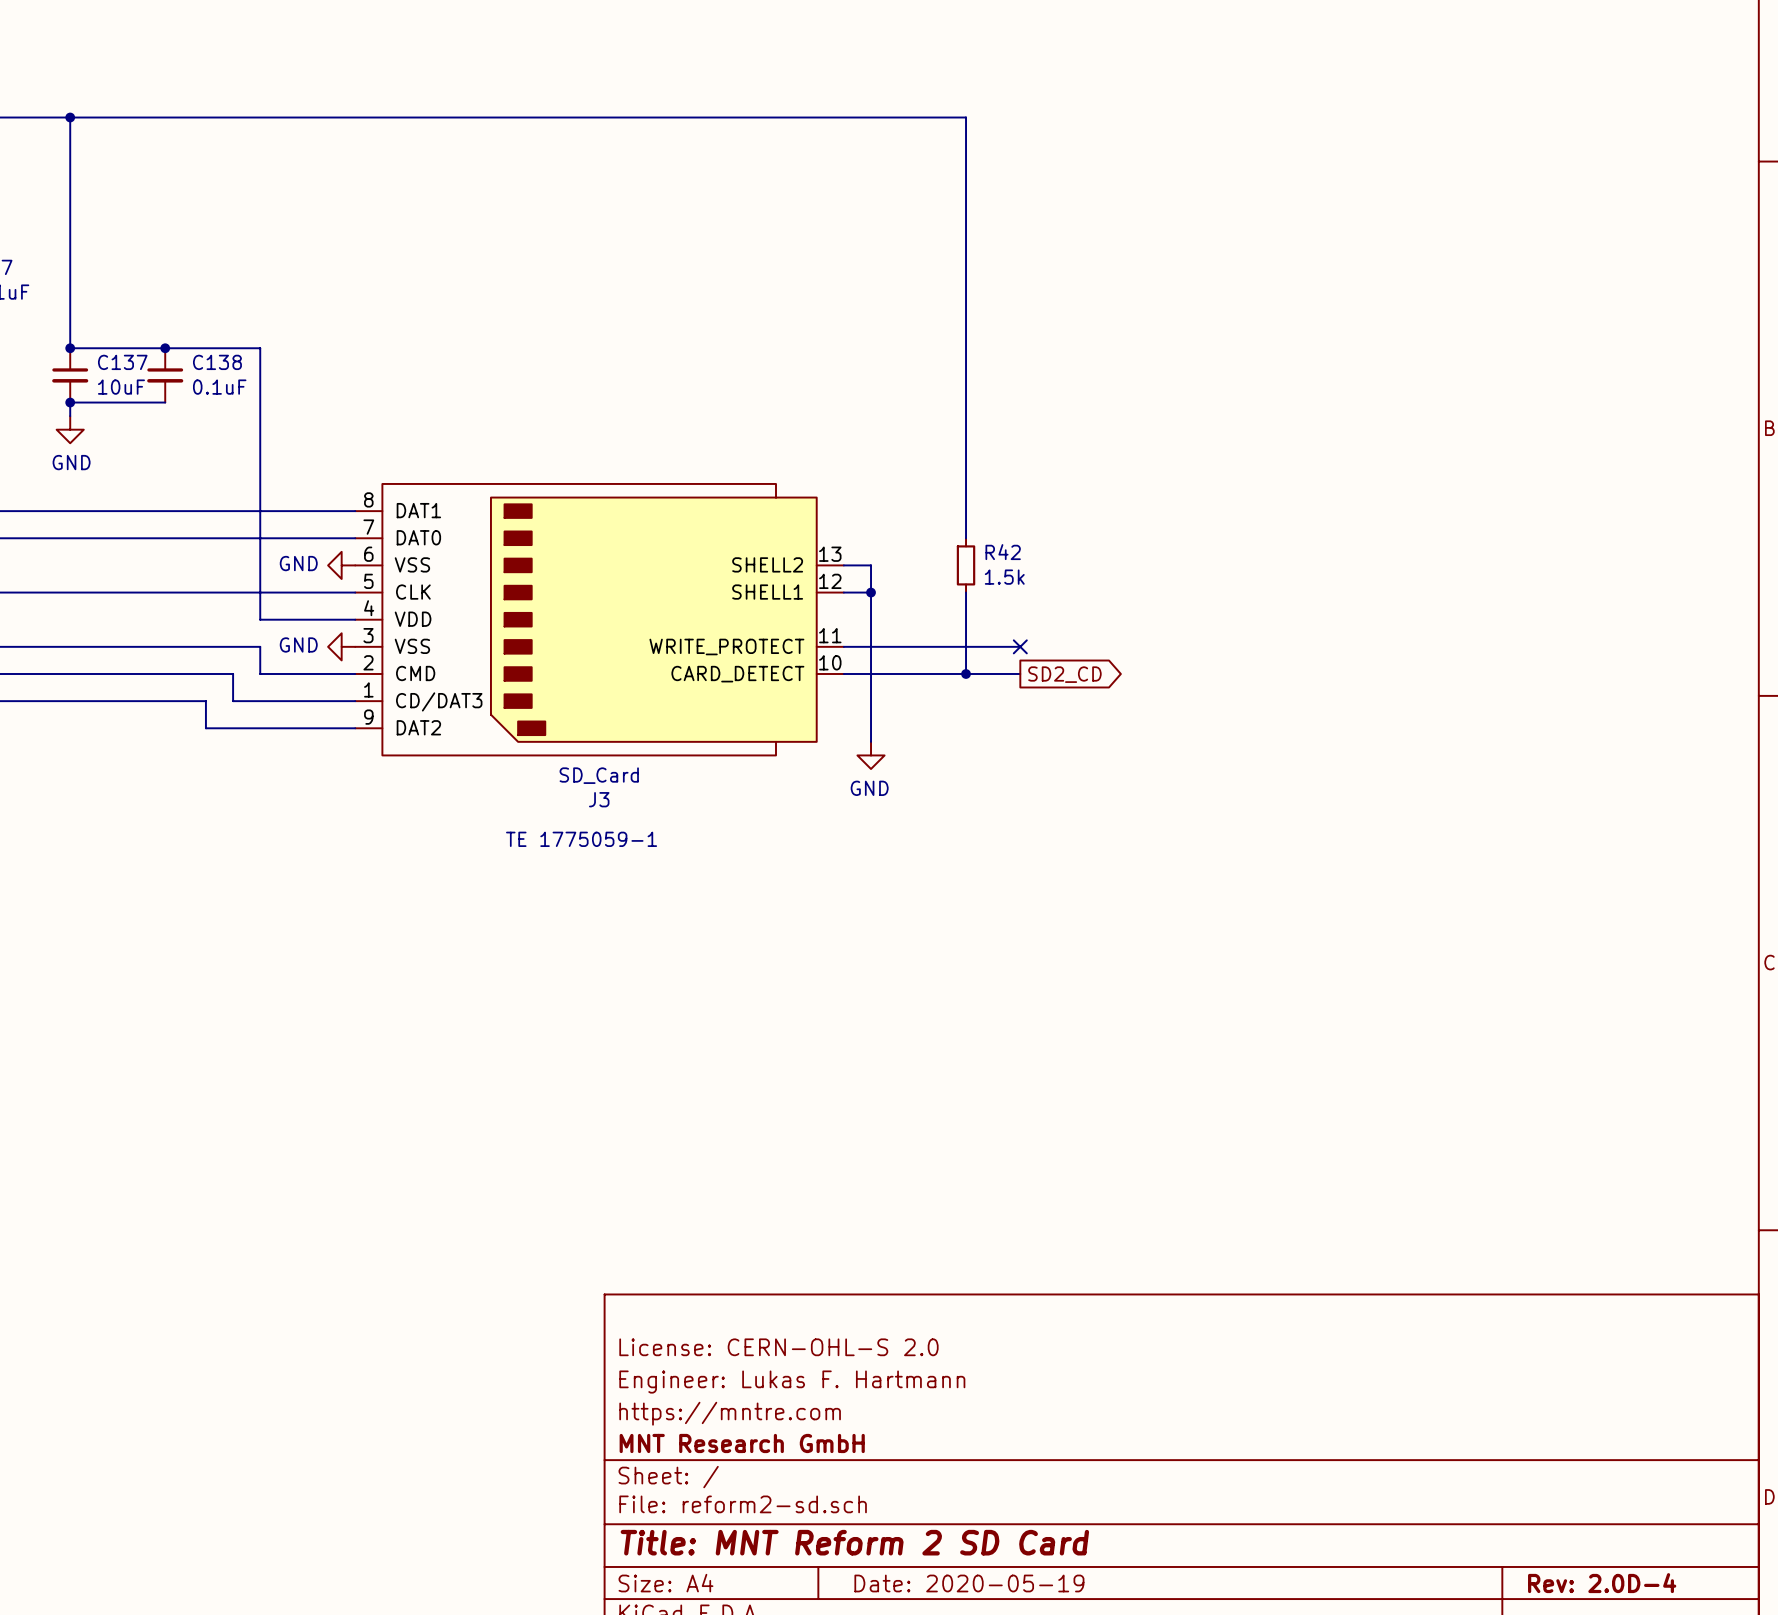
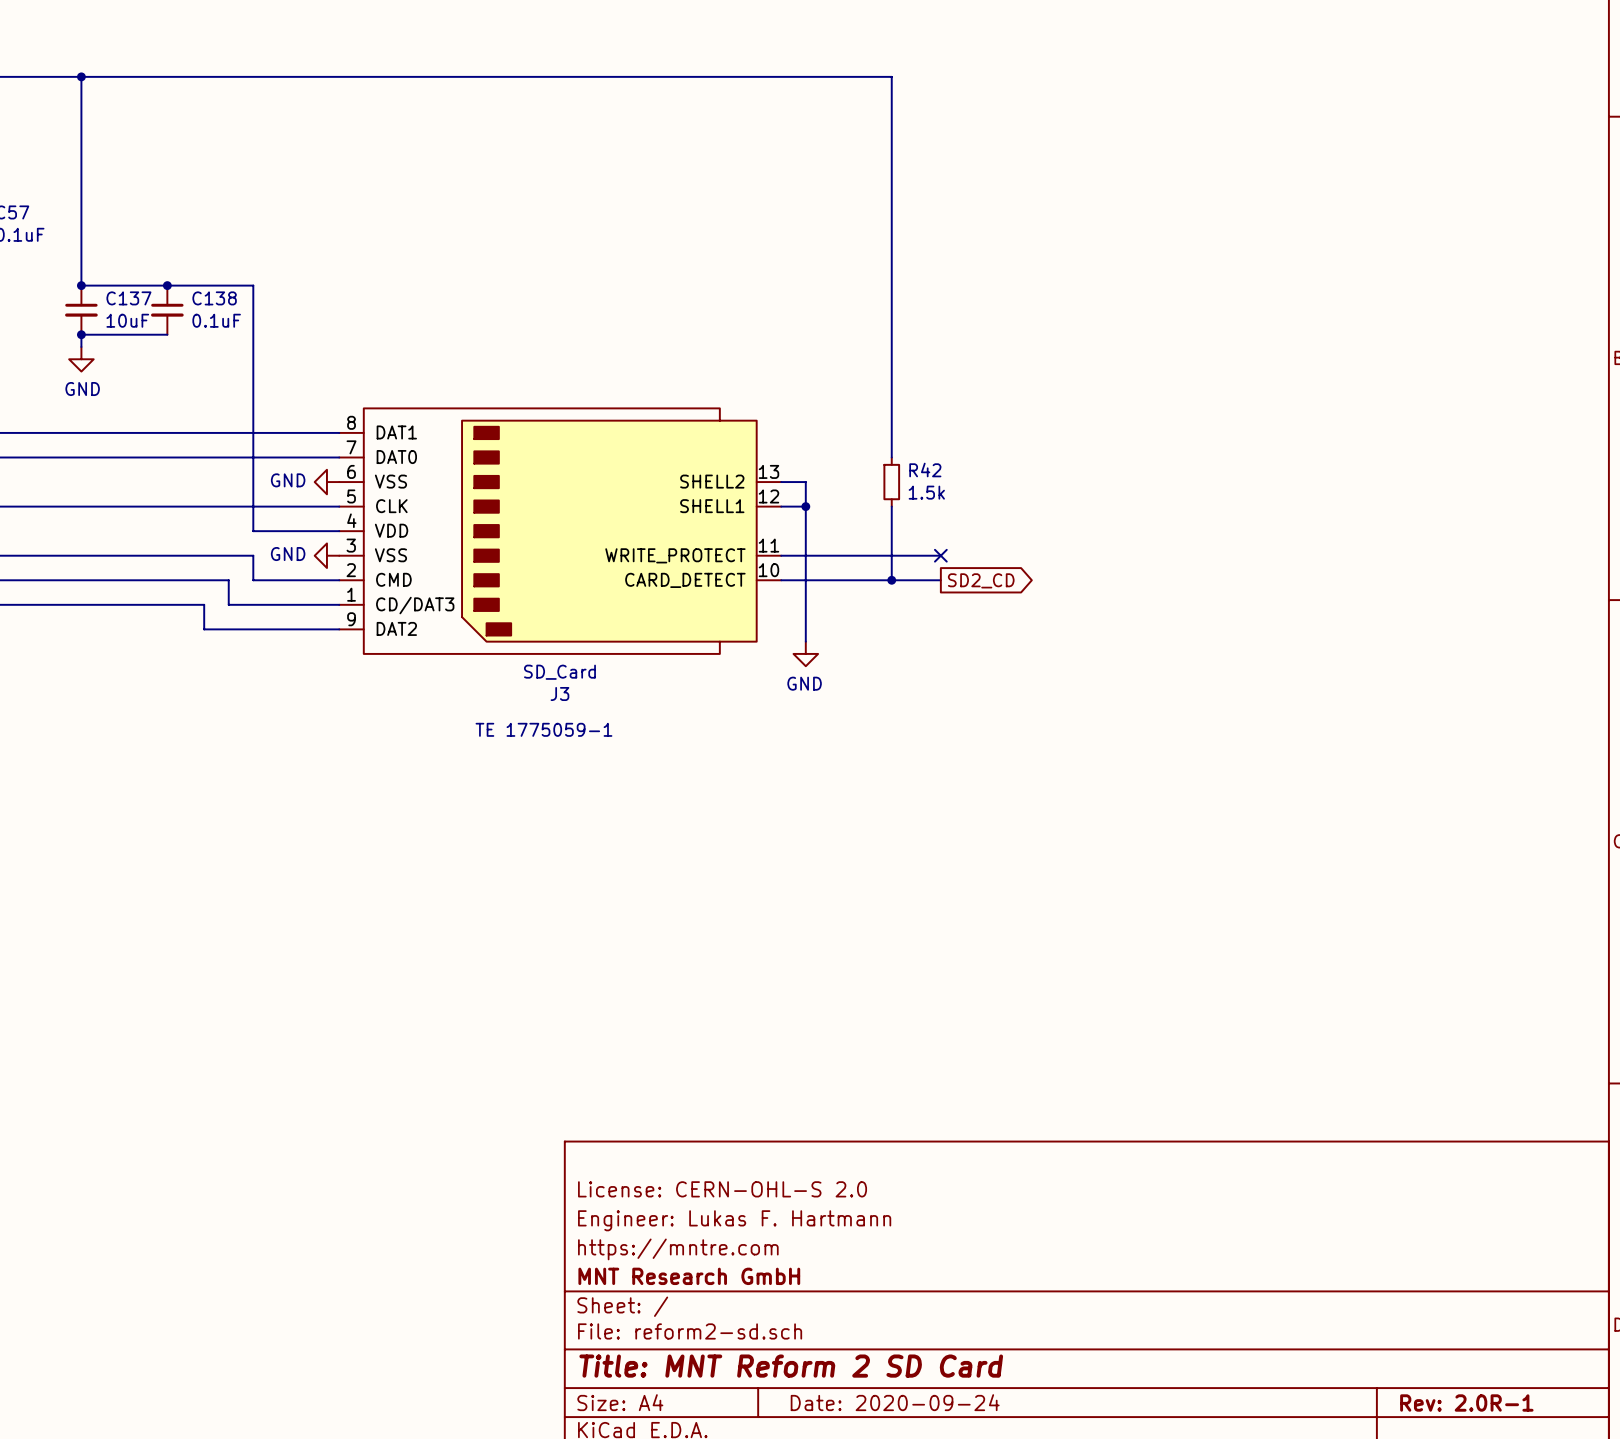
title block: Date: 2020-05-19 (969, 1583) -> Date: 2020-09-24 (895, 1402)
title block: Rev: 2.0D-4 (1602, 1583) -> Rev: 2.0R-1 (1466, 1403)

